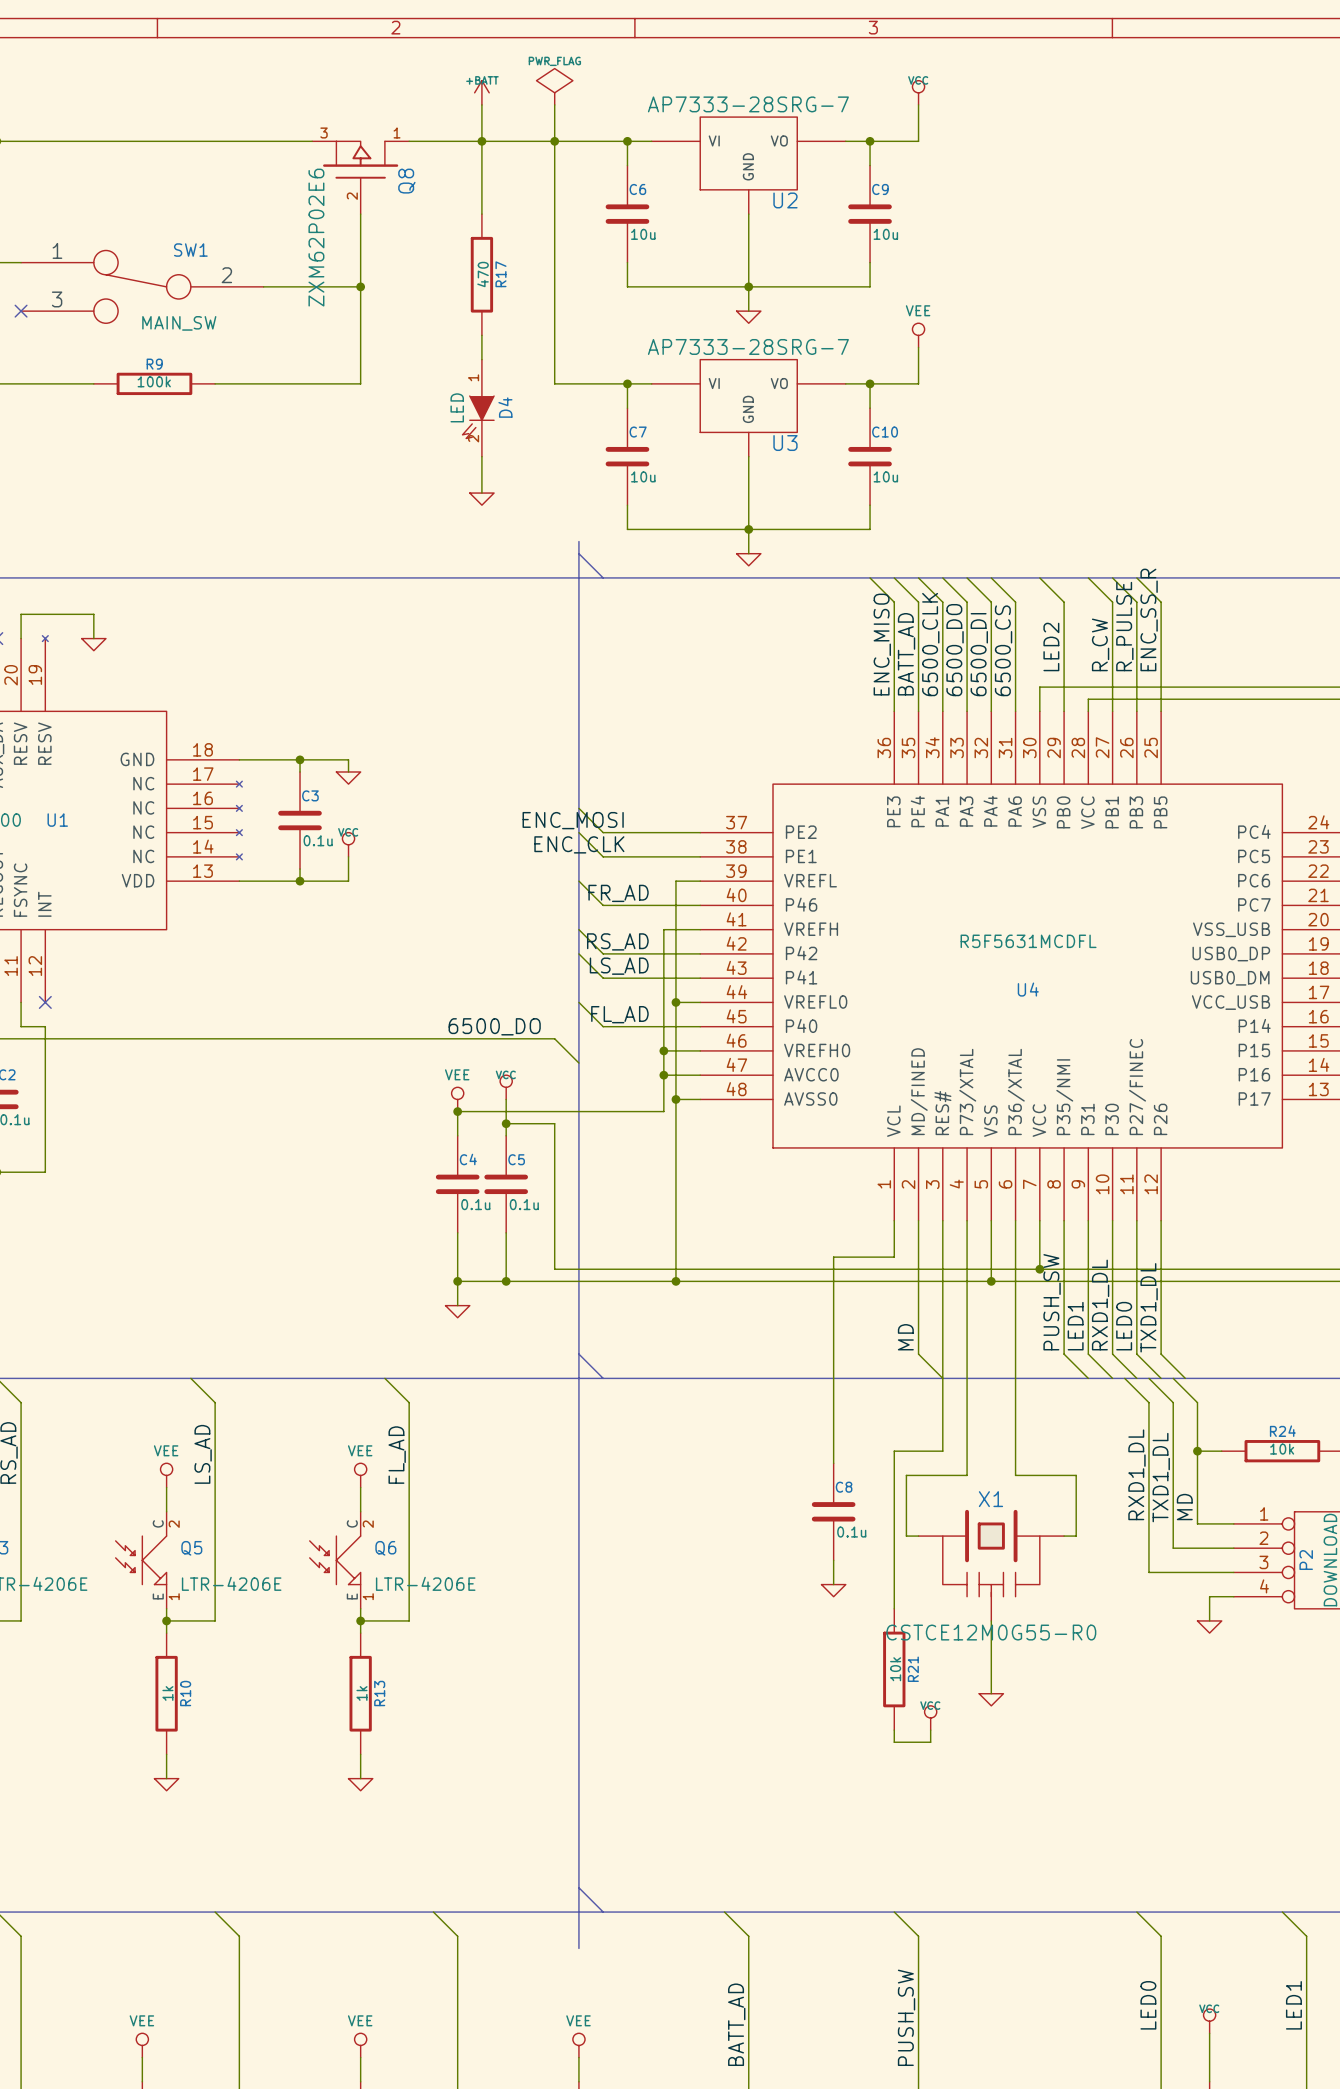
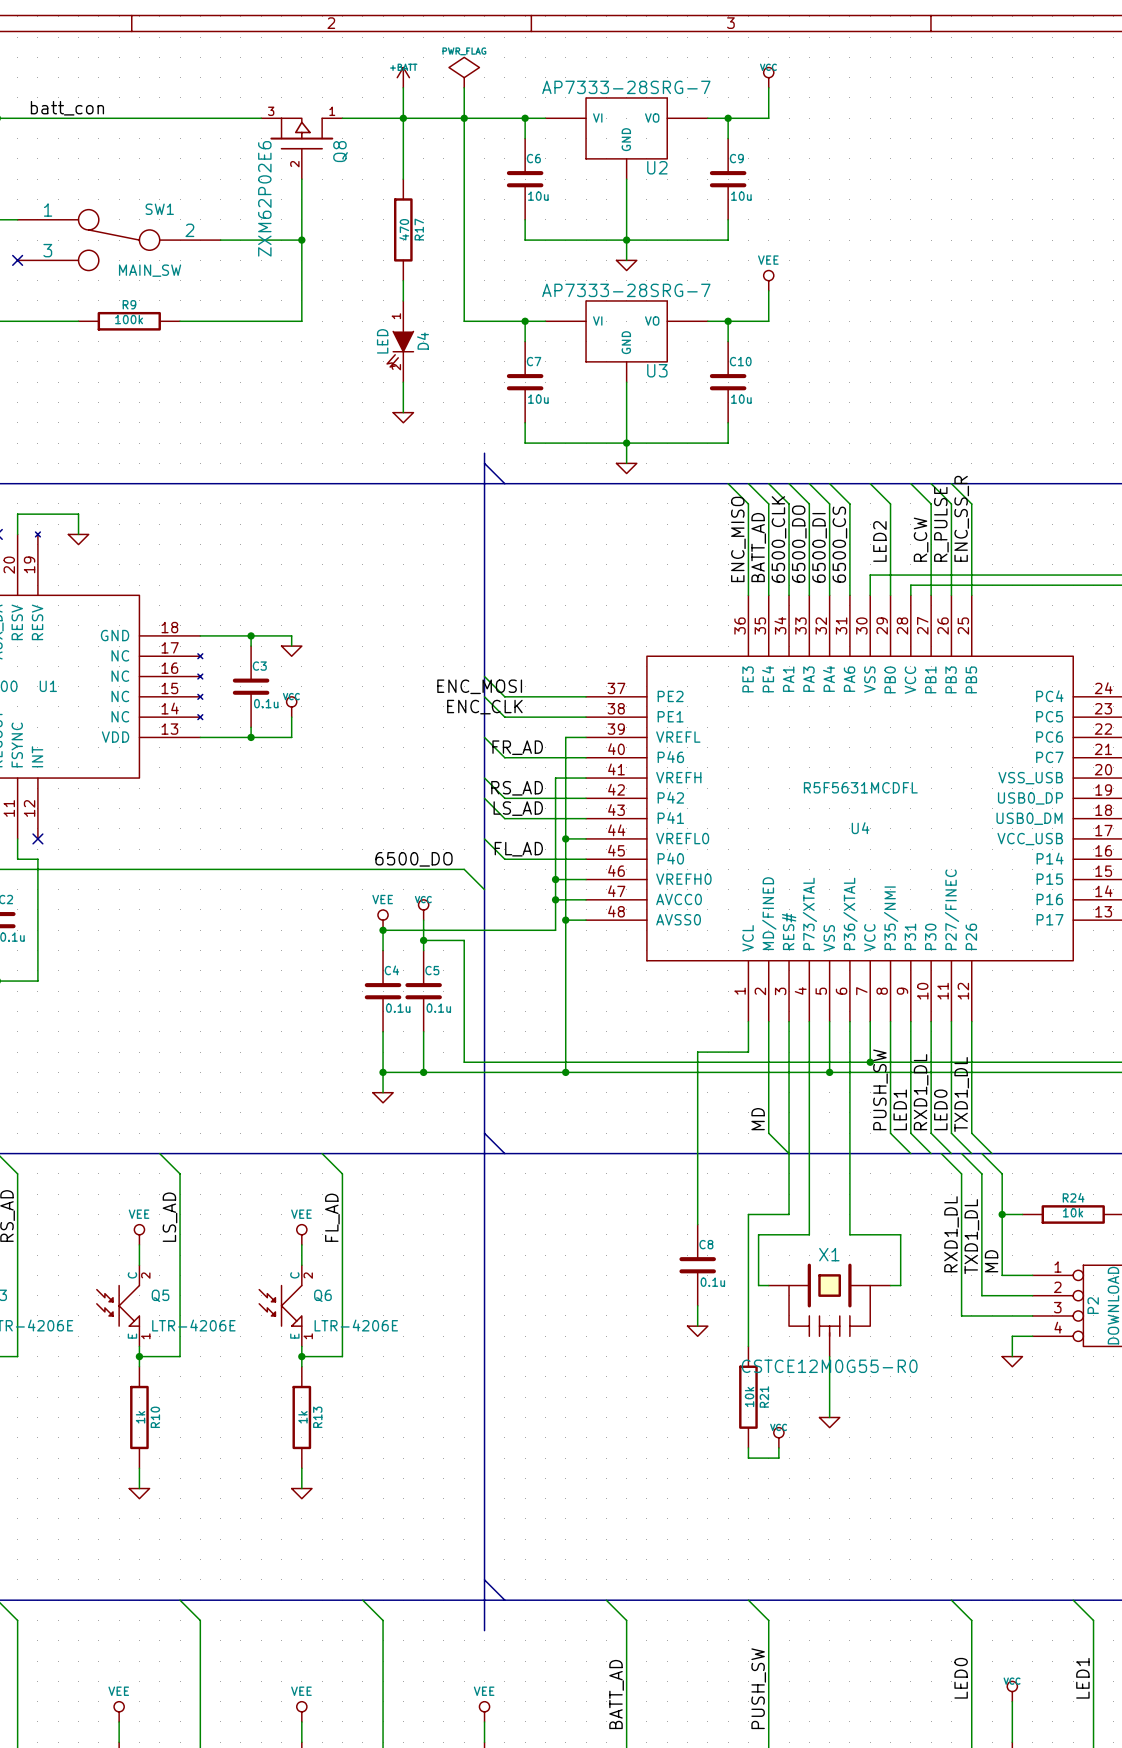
label: none -> batt_con (67, 108)

